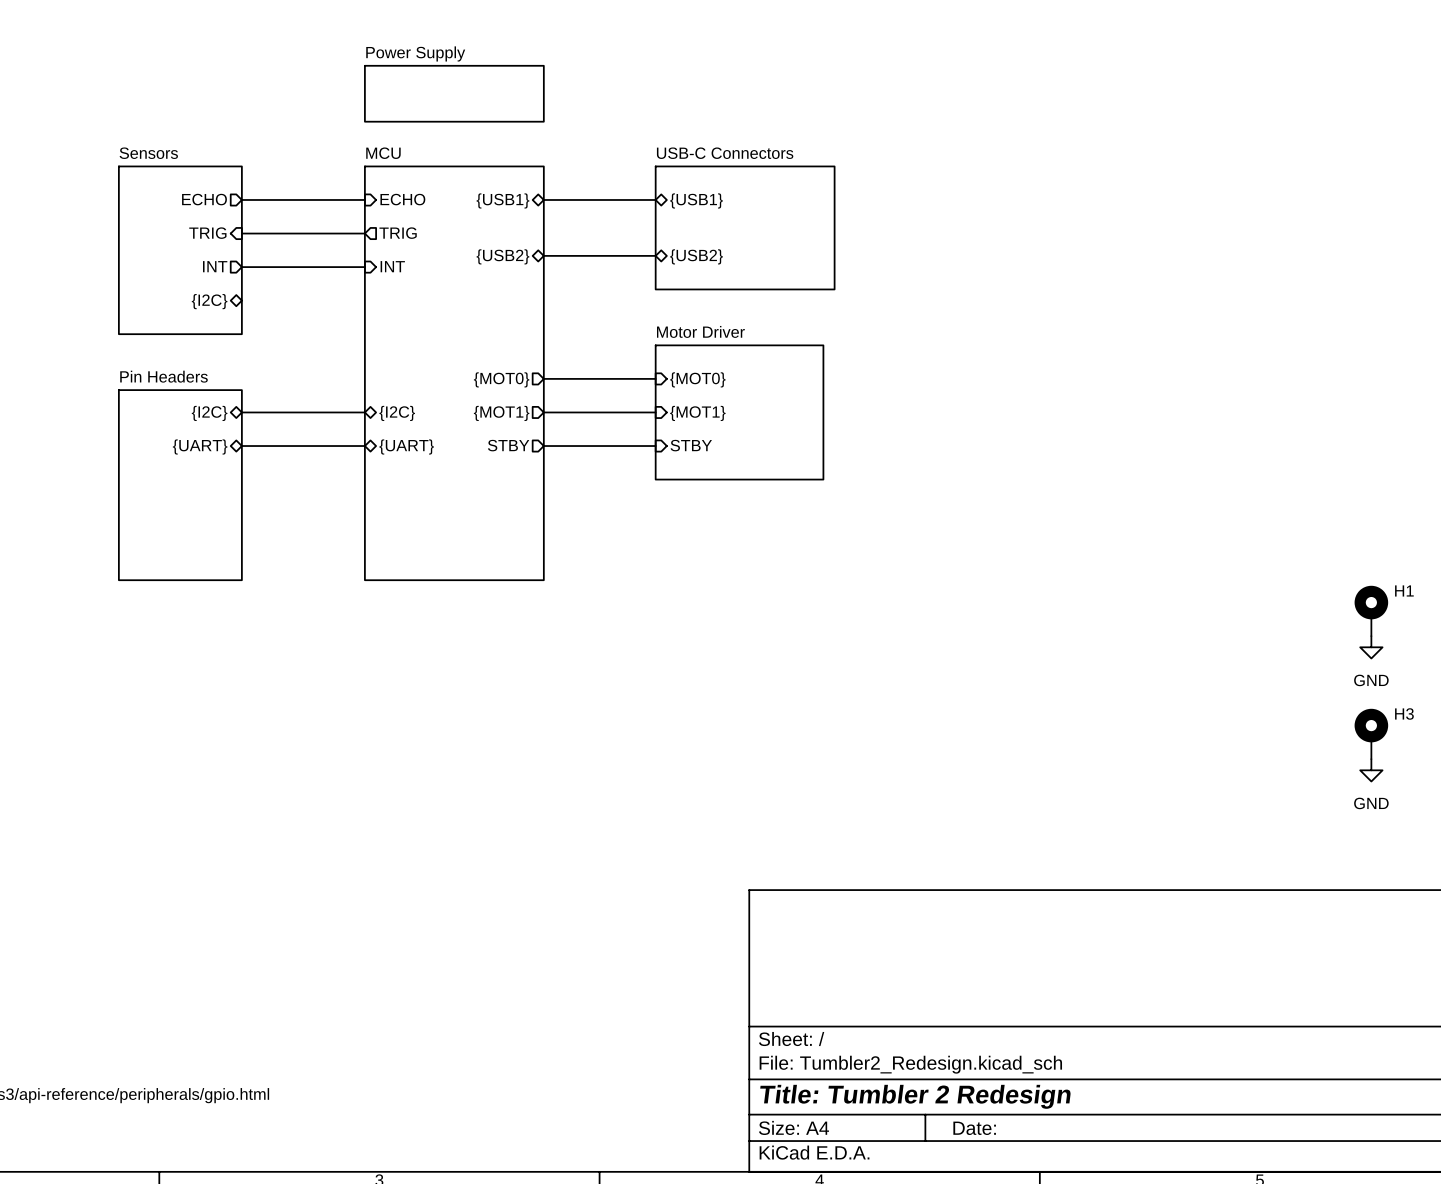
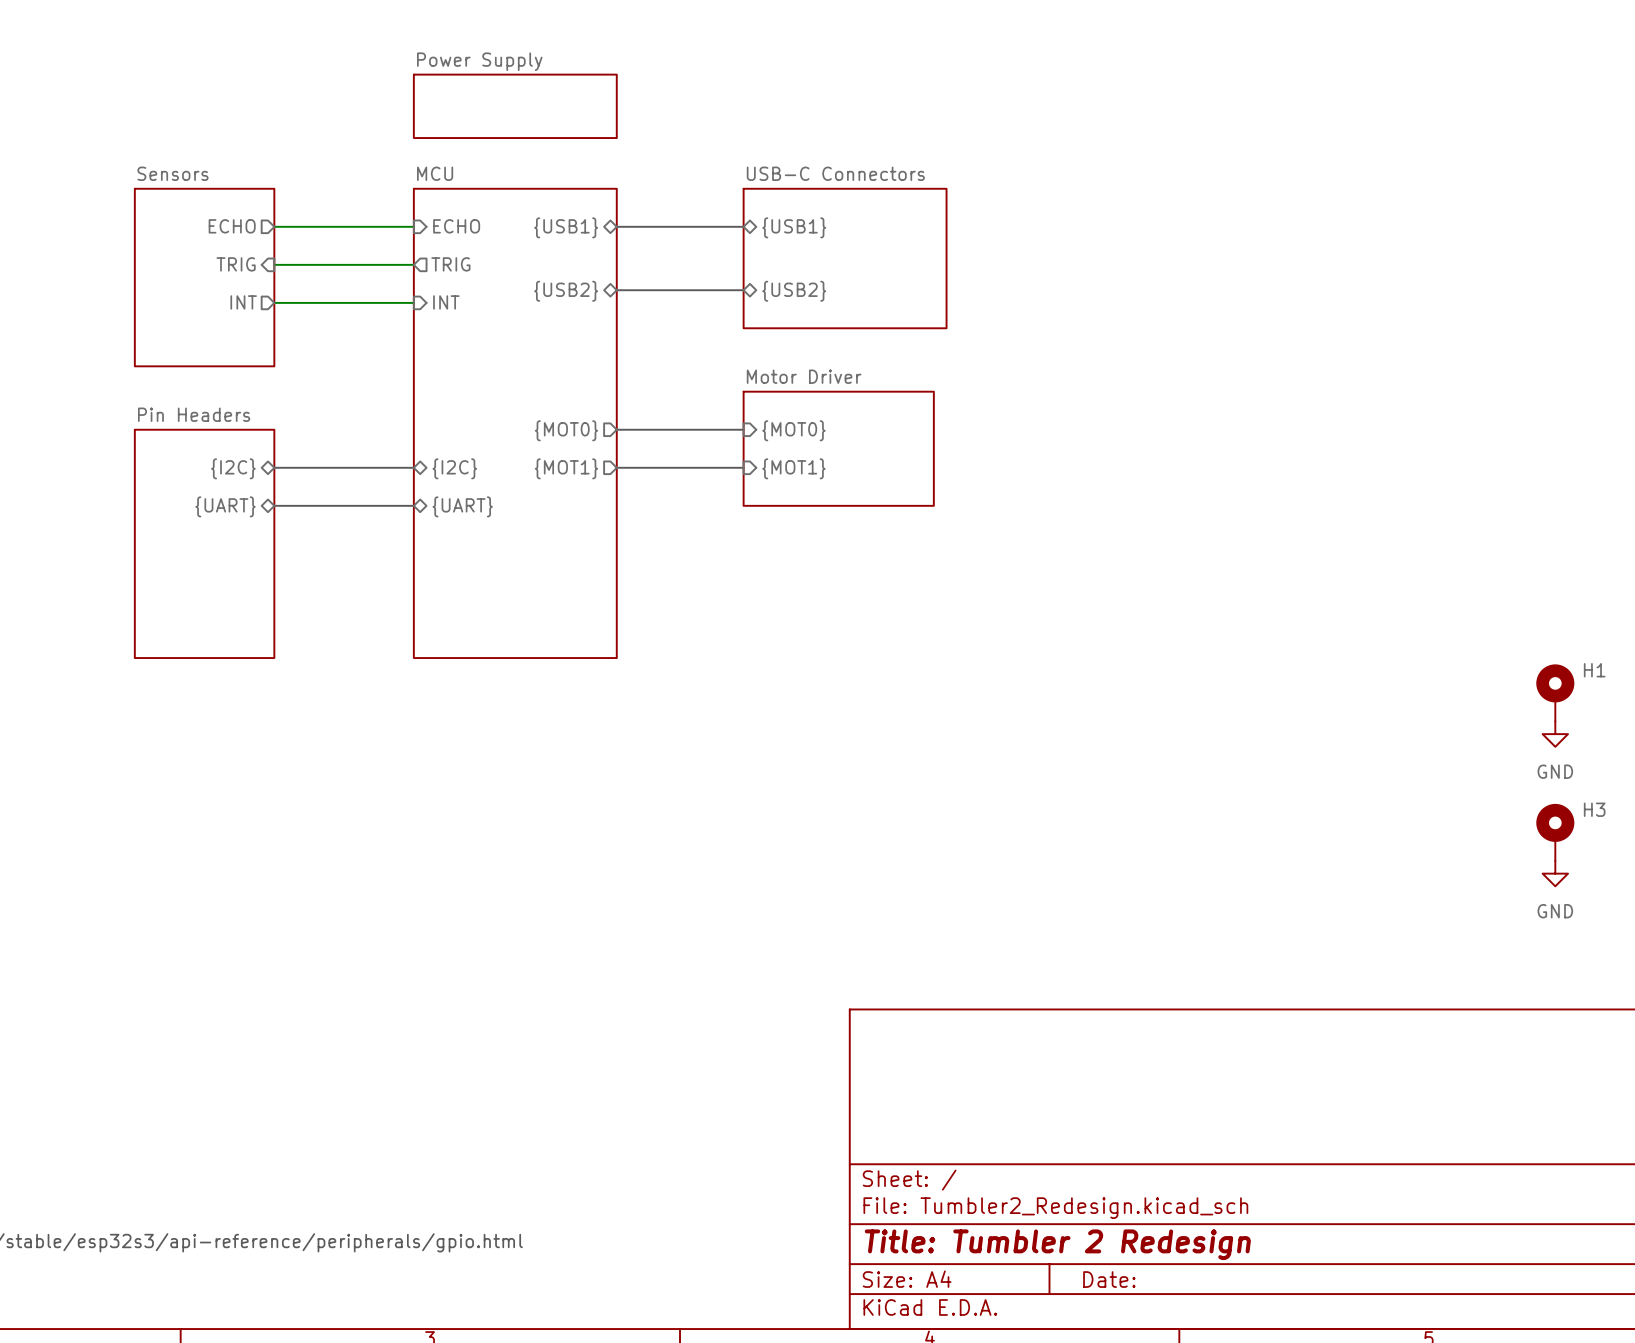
sheet Sensors shape: [118, 165, 243, 335] -> [134, 188, 276, 368]
sheet pin: {I2C} (209, 301) -> none
sheet Pin Headers shape: [118, 389, 243, 581] -> [134, 428, 276, 659]
sheet Motor Driver: none -> (838, 448)
sheet Motor Driver: (739, 412) -> none
sheet pin: STBY (508, 445) -> none
sheet pin: STBY (691, 445) -> none
wire: (543, 446) (655, 446) -> none

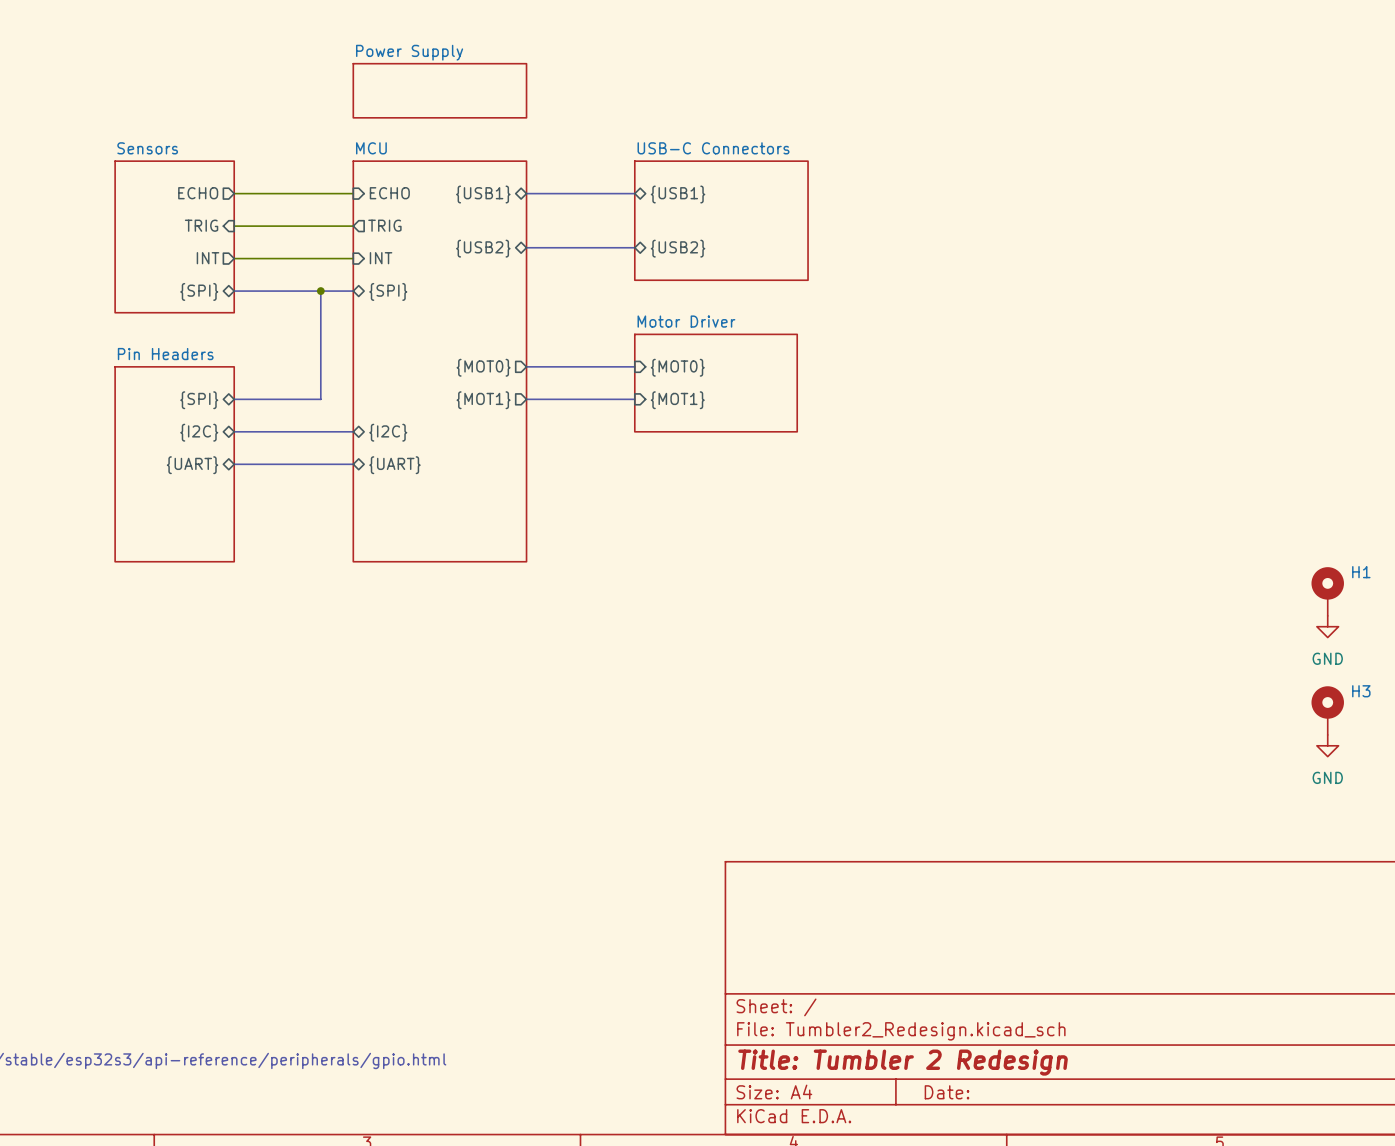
bus: none -> (234, 291) (353, 291)
junction: none -> (320, 291)
sheet pin: none -> {SPI} (199, 291)
sheet pin: none -> {SPI} (388, 291)
bus: (375, 467) (413, 467) -> (320, 399) (320, 291)
sheet pin: {I2C} (233, 468) -> {SPI} (199, 400)
sheet pin: {I2C} (454, 468) -> none
sheet pin: {UART} (225, 506) -> {I2C} (199, 432)
sheet pin: {UART} (462, 506) -> {I2C} (388, 432)
bus: none -> (234, 464) (353, 464)
sheet pin: none -> {UART} (192, 465)
sheet pin: none -> {UART} (394, 465)

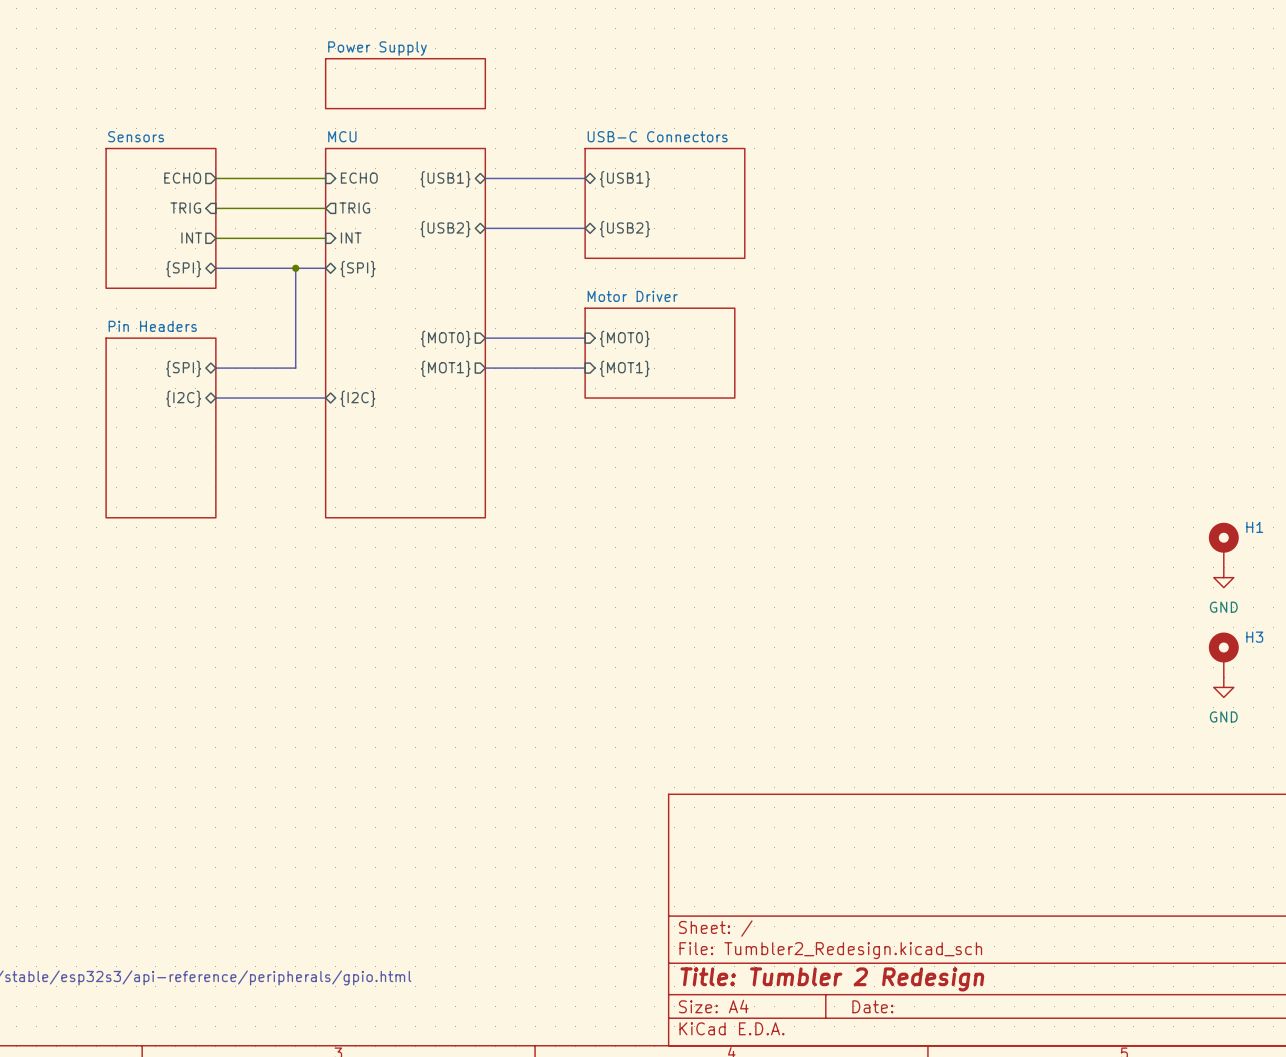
bus: (234, 464) (353, 464) -> none
sheet pin: {UART} (192, 465) -> none
sheet pin: {UART} (394, 465) -> none

